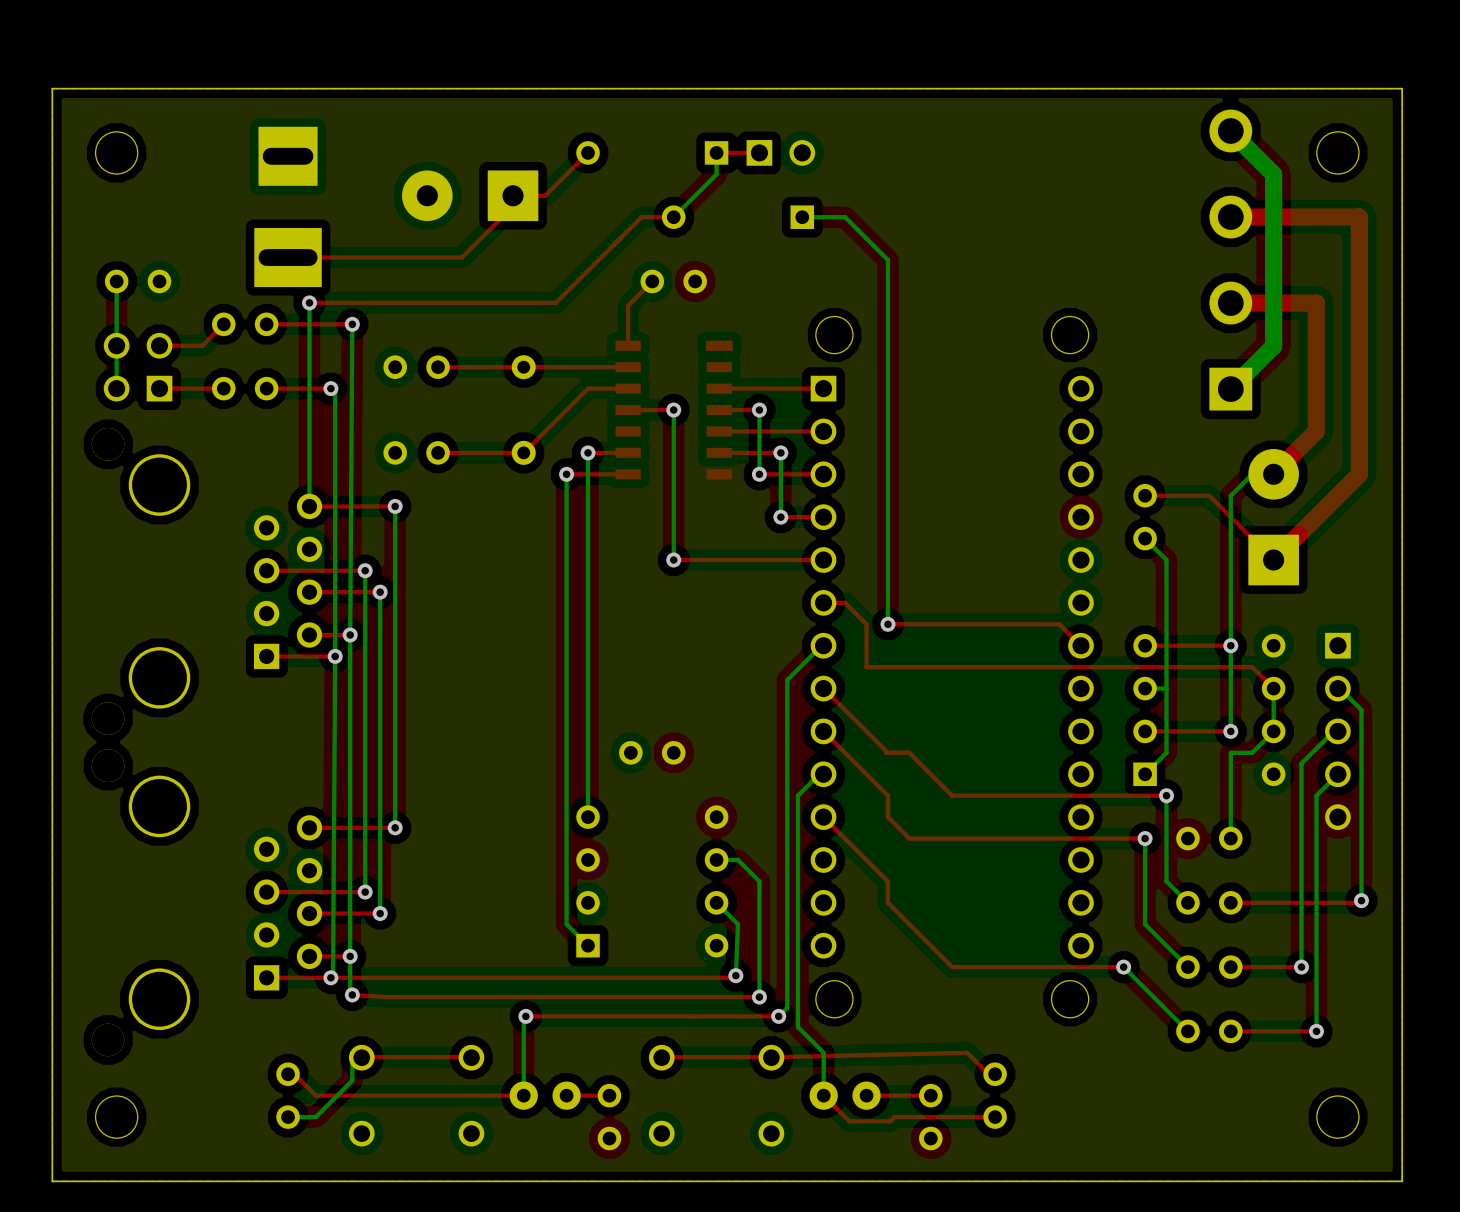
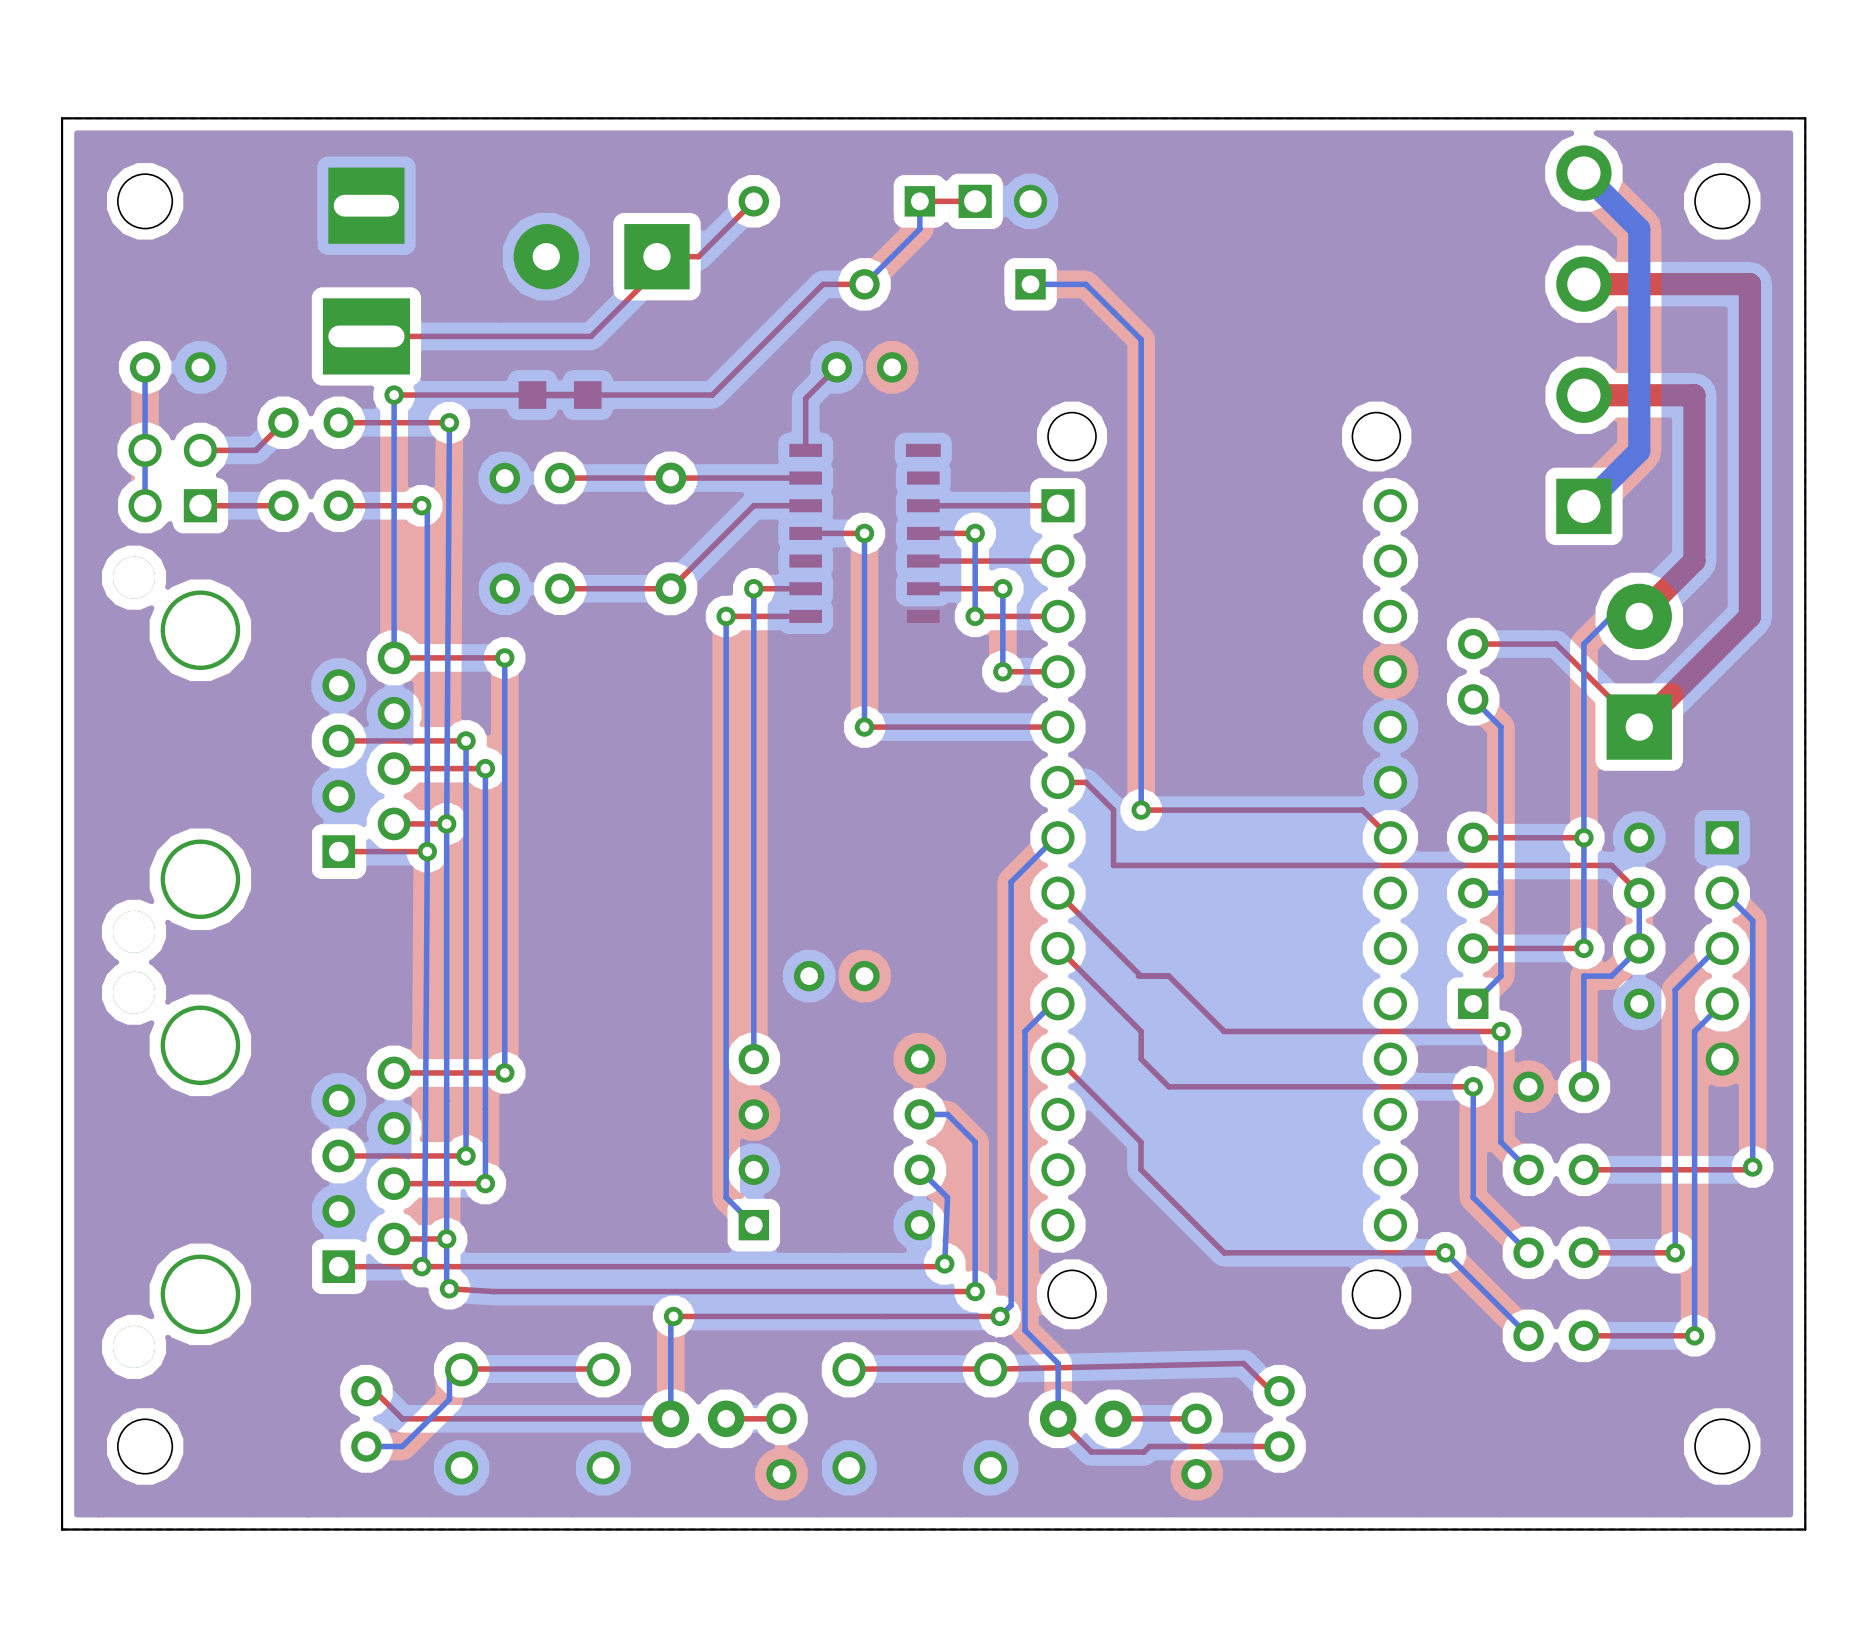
part: none -> (560, 395)
top track: (459, 302) (416, 302) -> none

